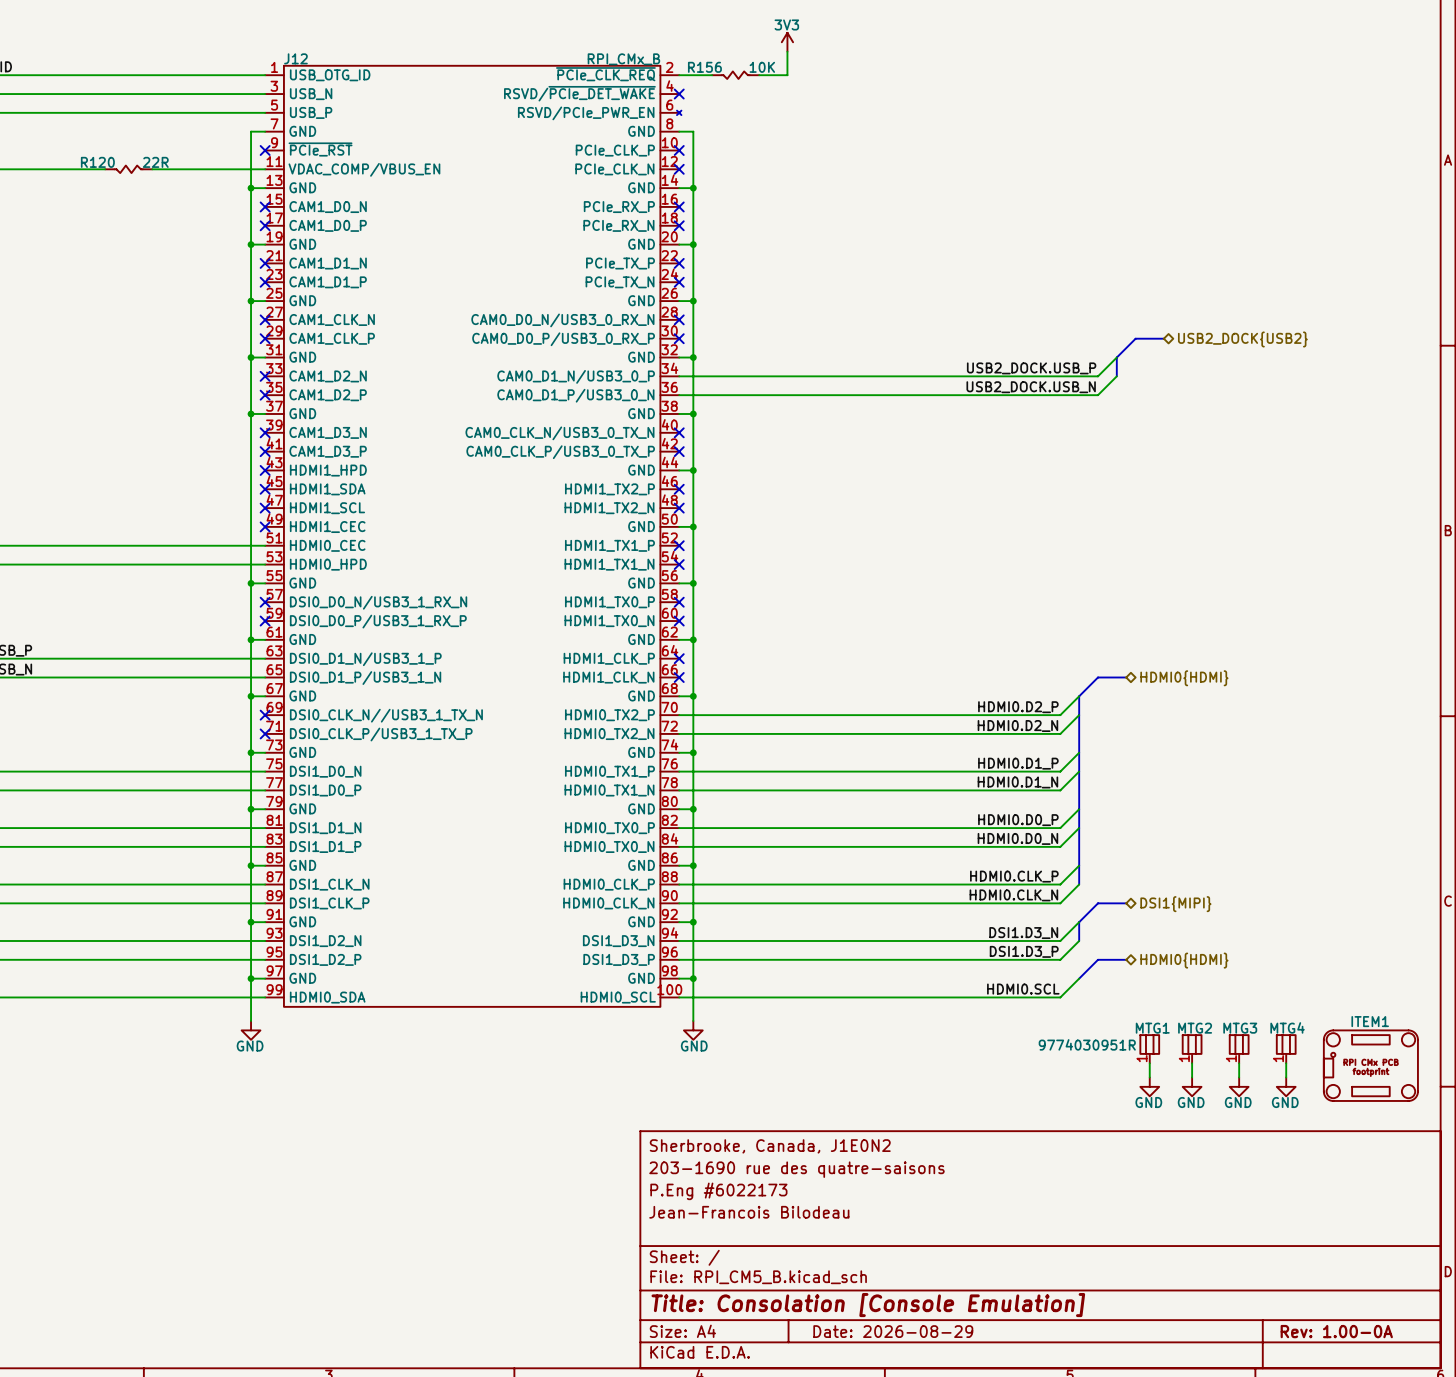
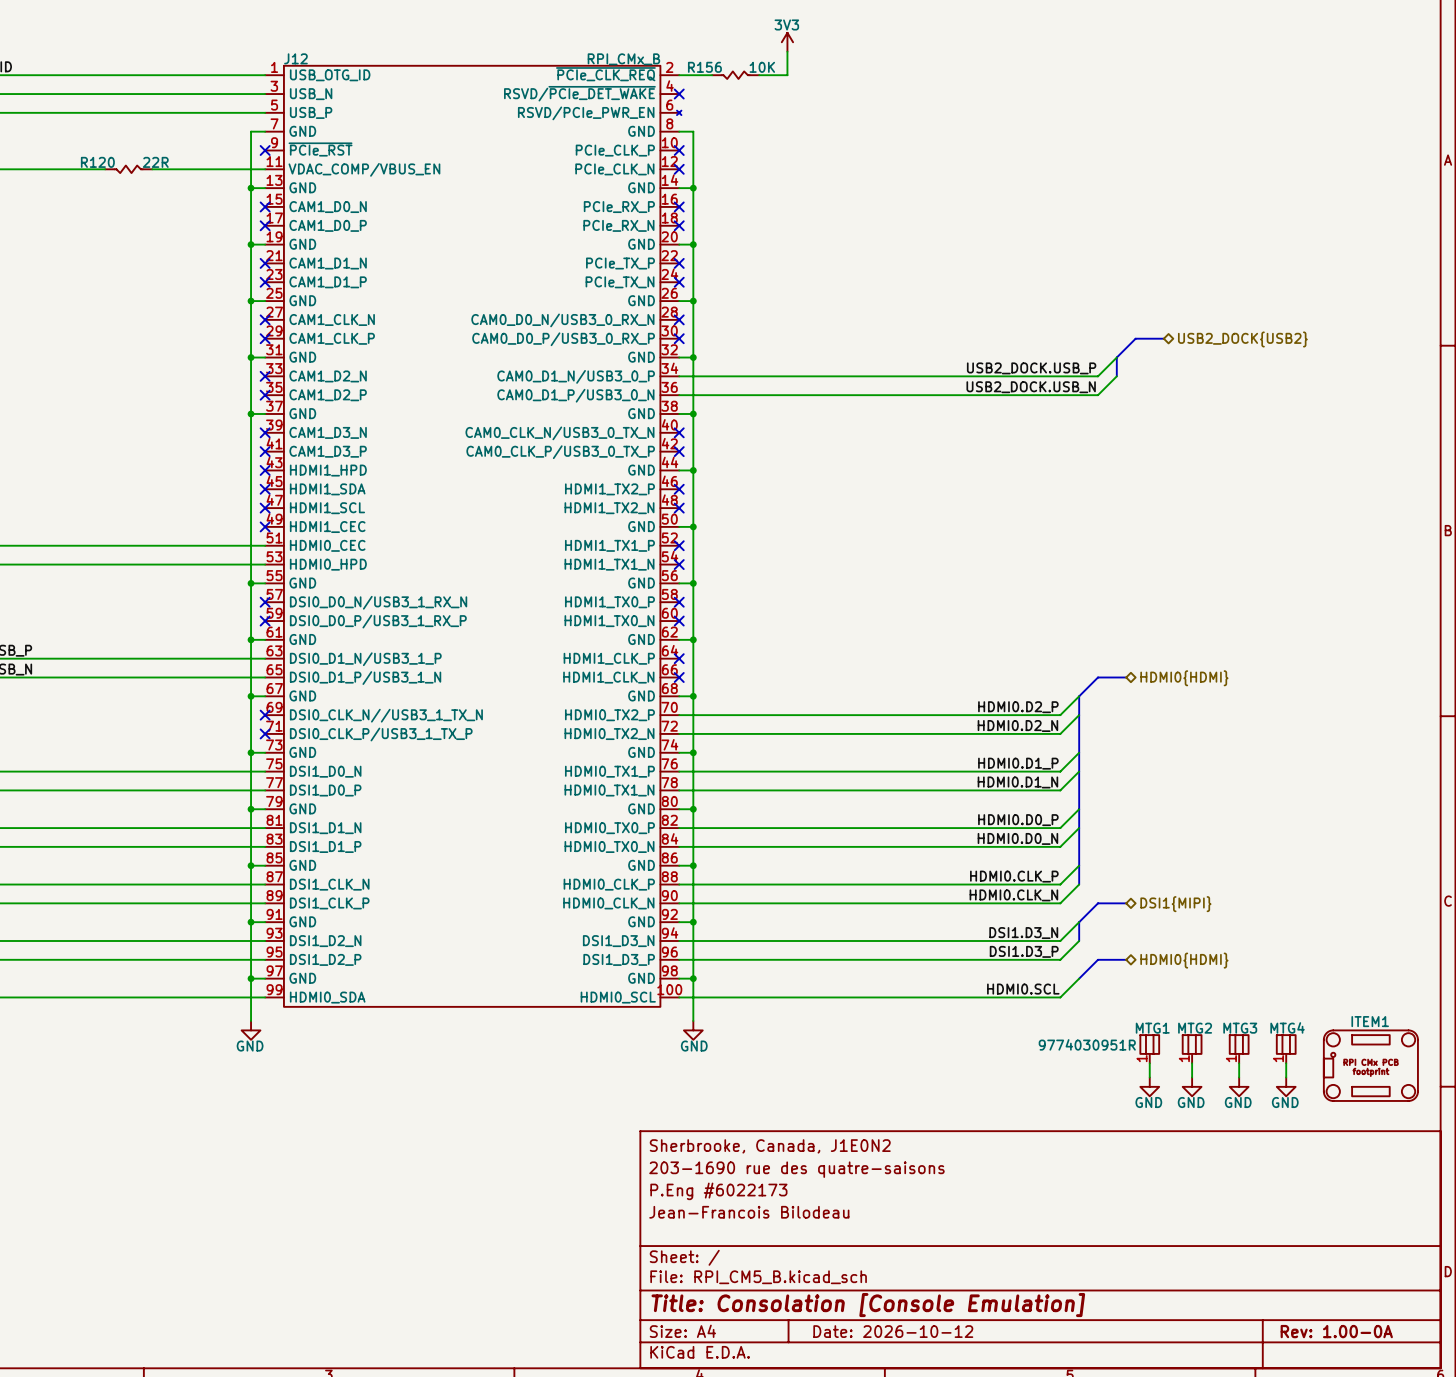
title block: Date: 2026-08-29 (893, 1331) -> Date: 2026-10-12 (893, 1331)

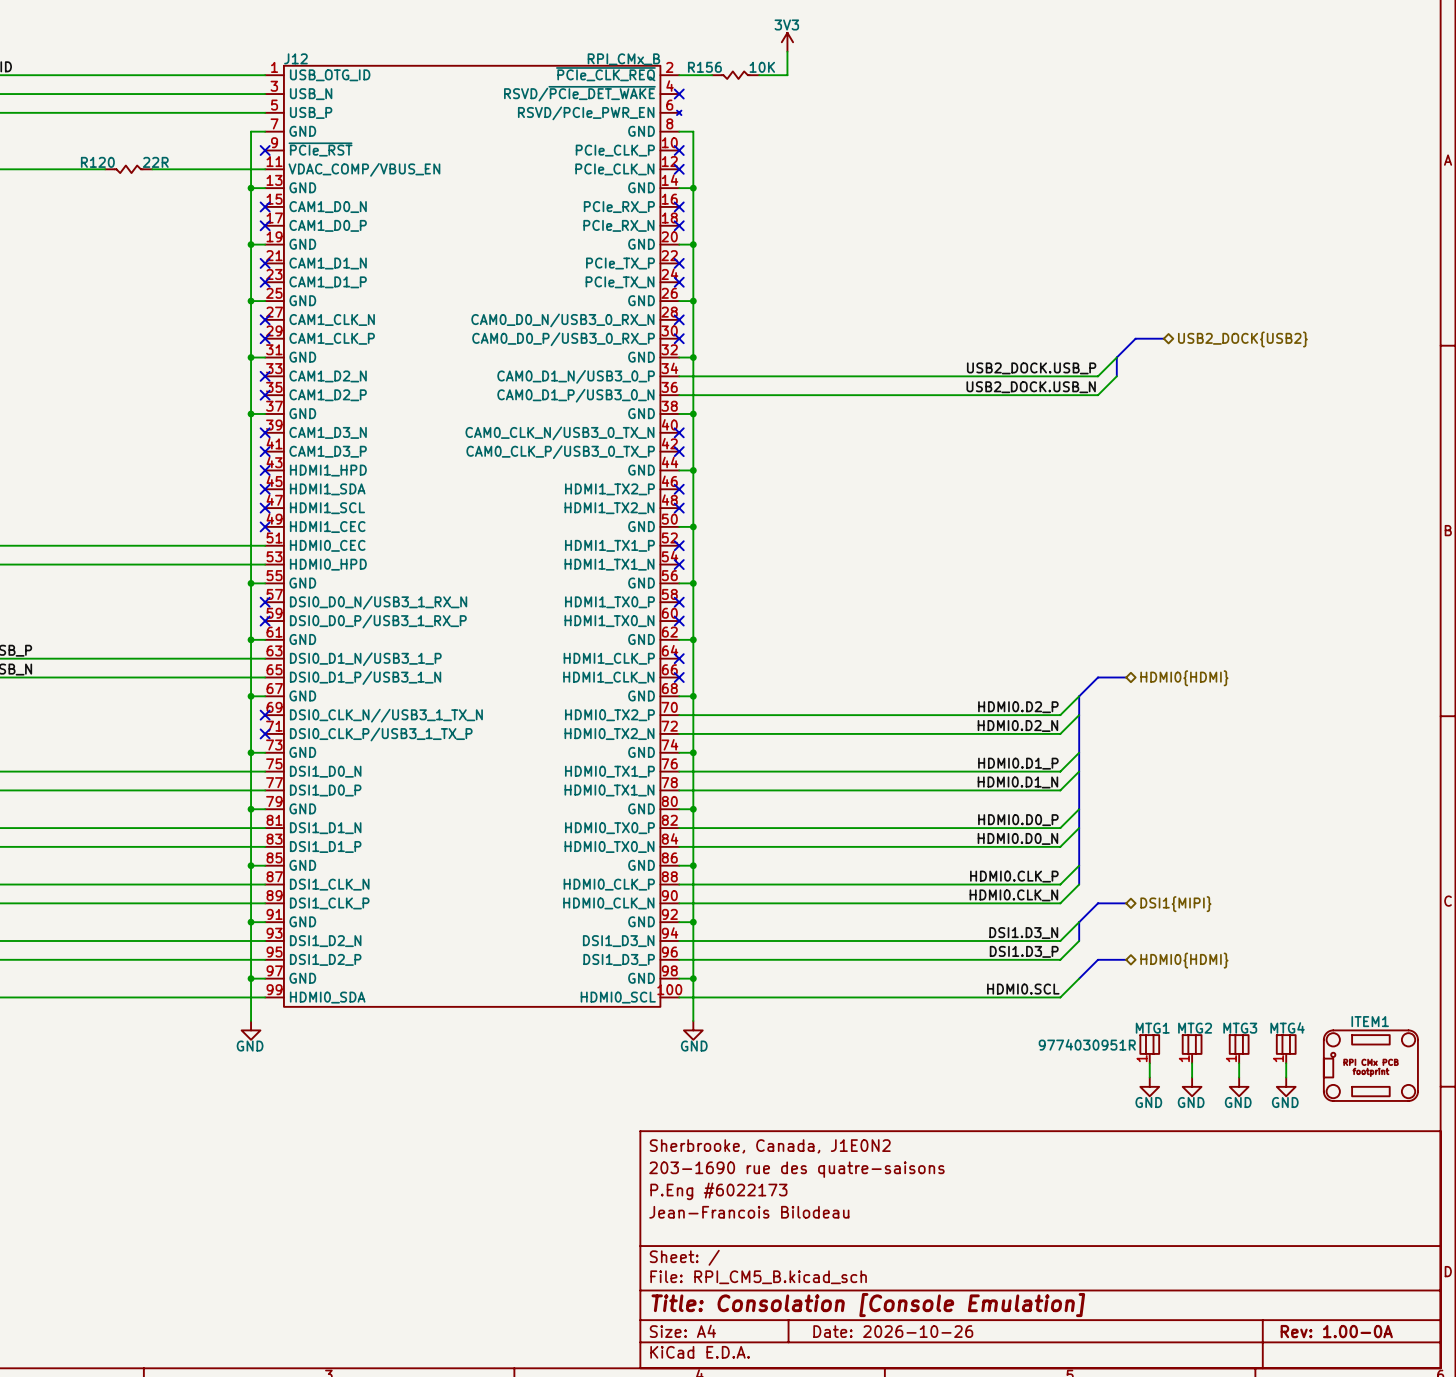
title block: Date: 2026-10-12 (893, 1331) -> Date: 2026-10-26 (893, 1331)

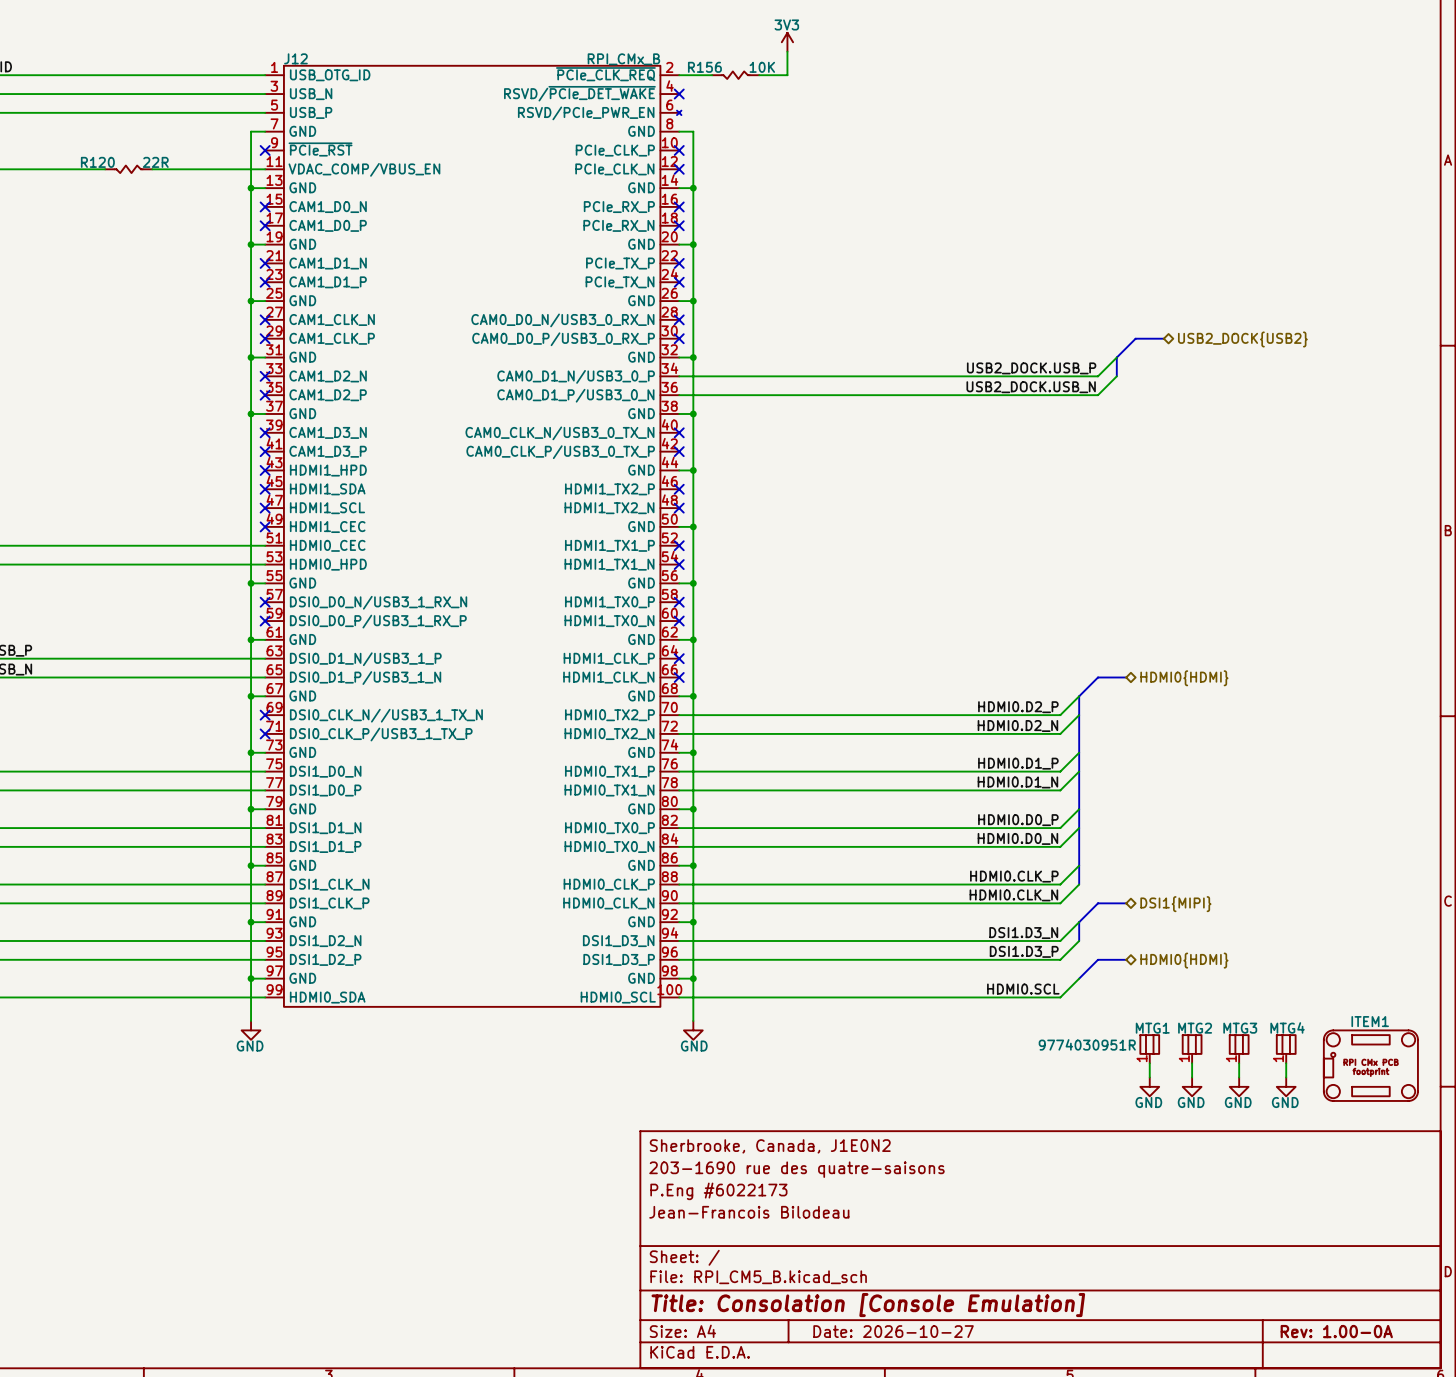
title block: Date: 2026-10-26 (893, 1331) -> Date: 2026-10-27 (893, 1331)

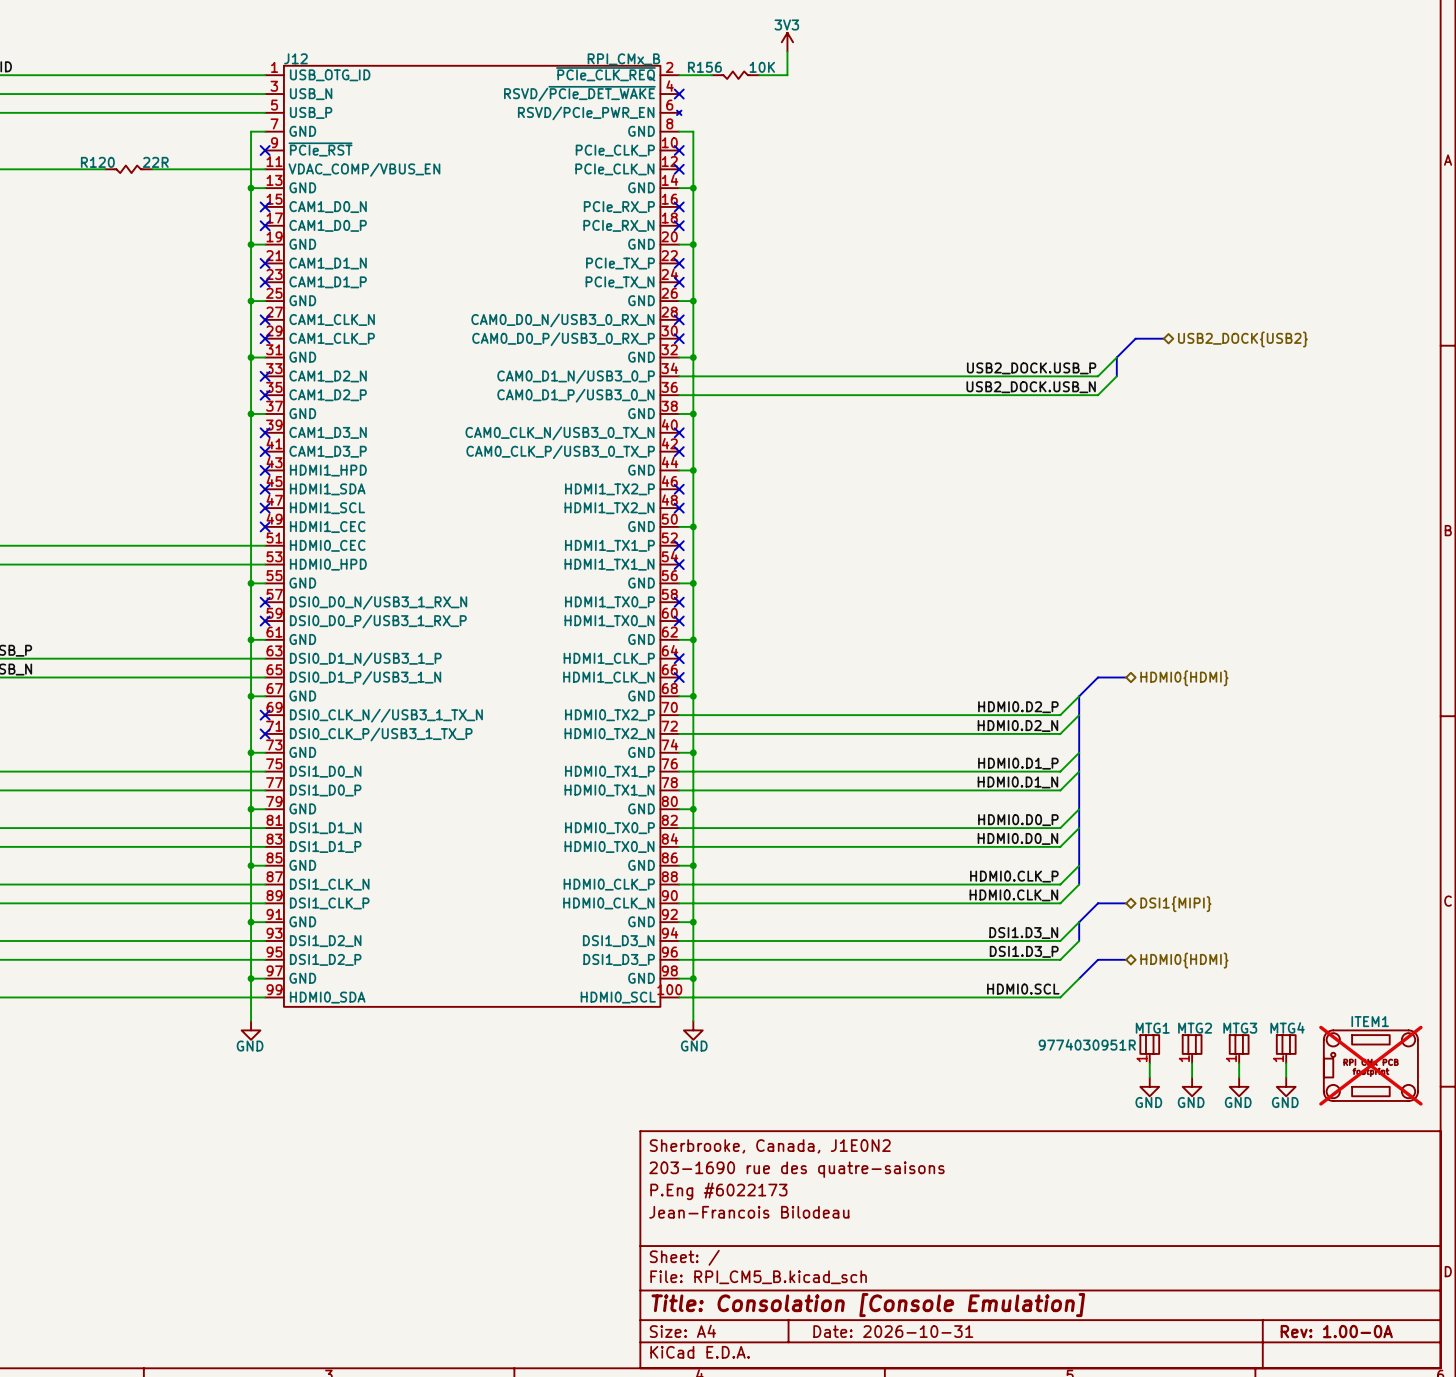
ITEM1 do-not-place cross: none -> (1370, 1065)
title block: Date: 2026-10-27 (893, 1331) -> Date: 2026-10-31 (893, 1331)

